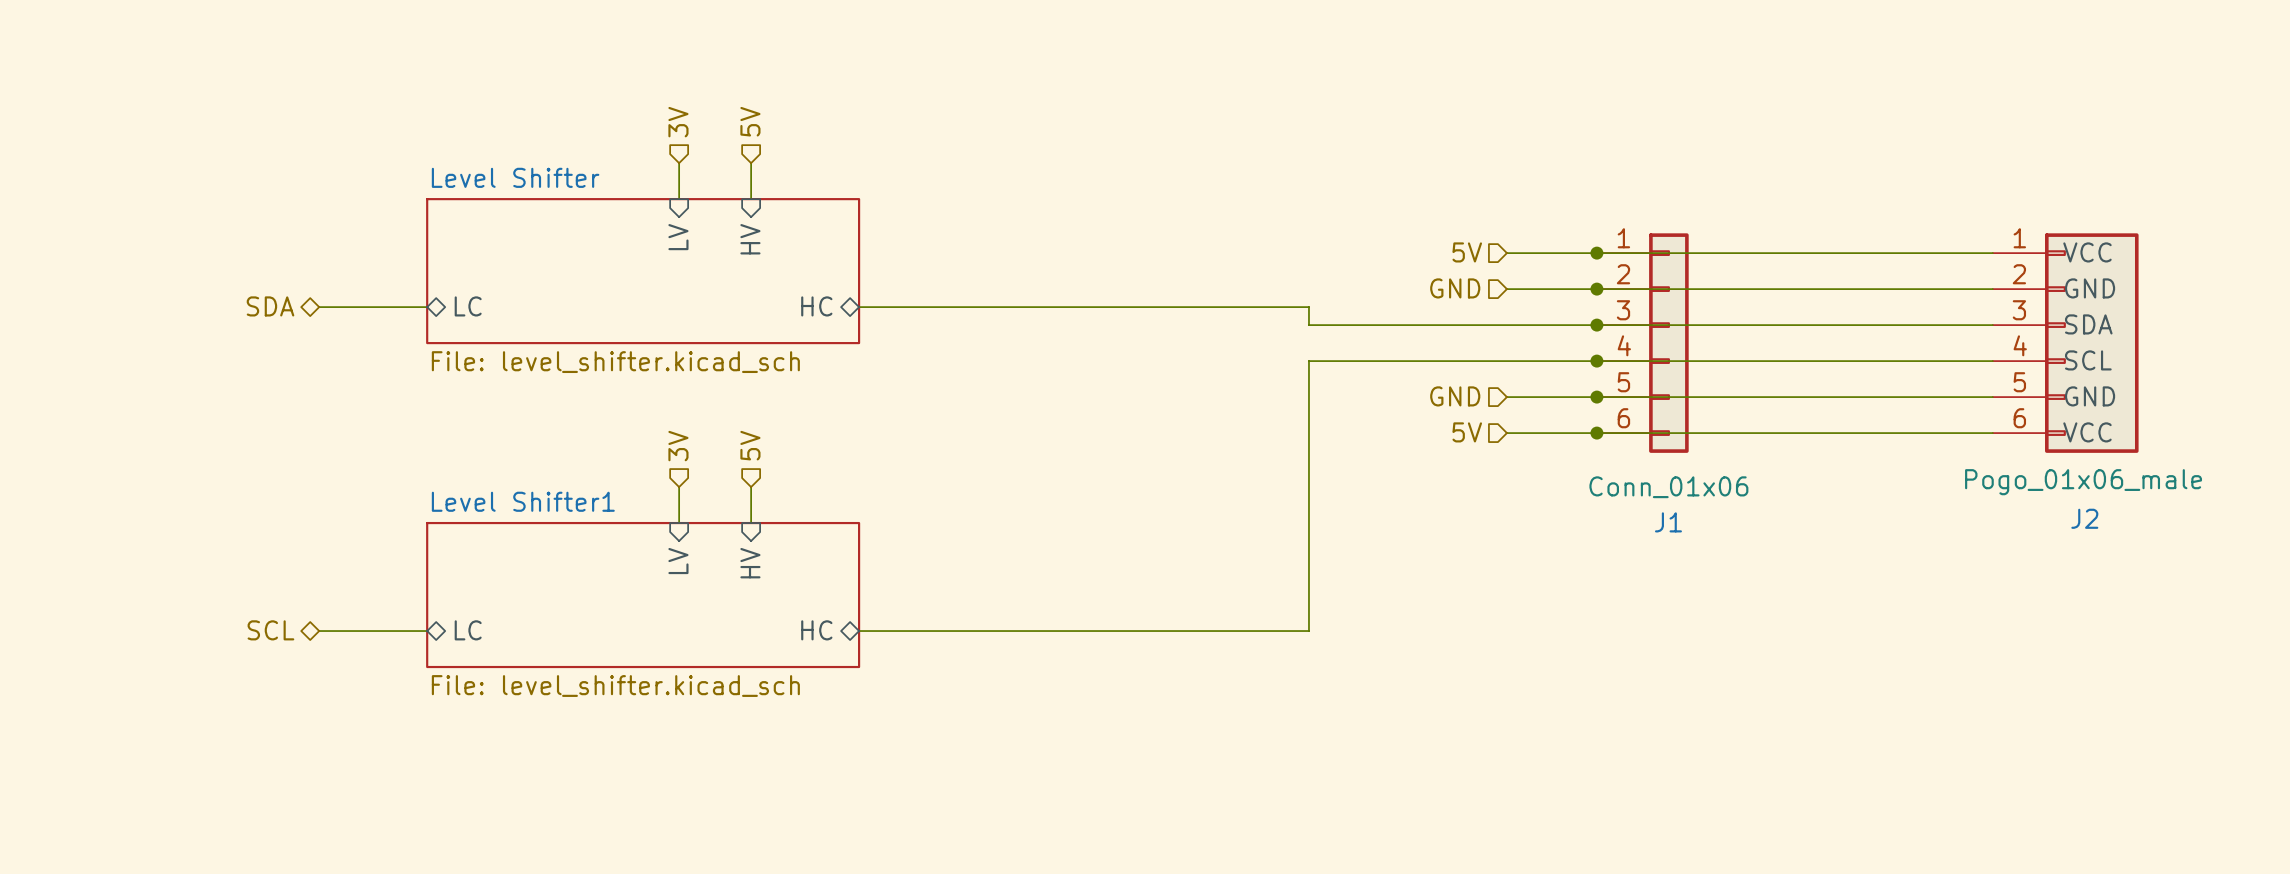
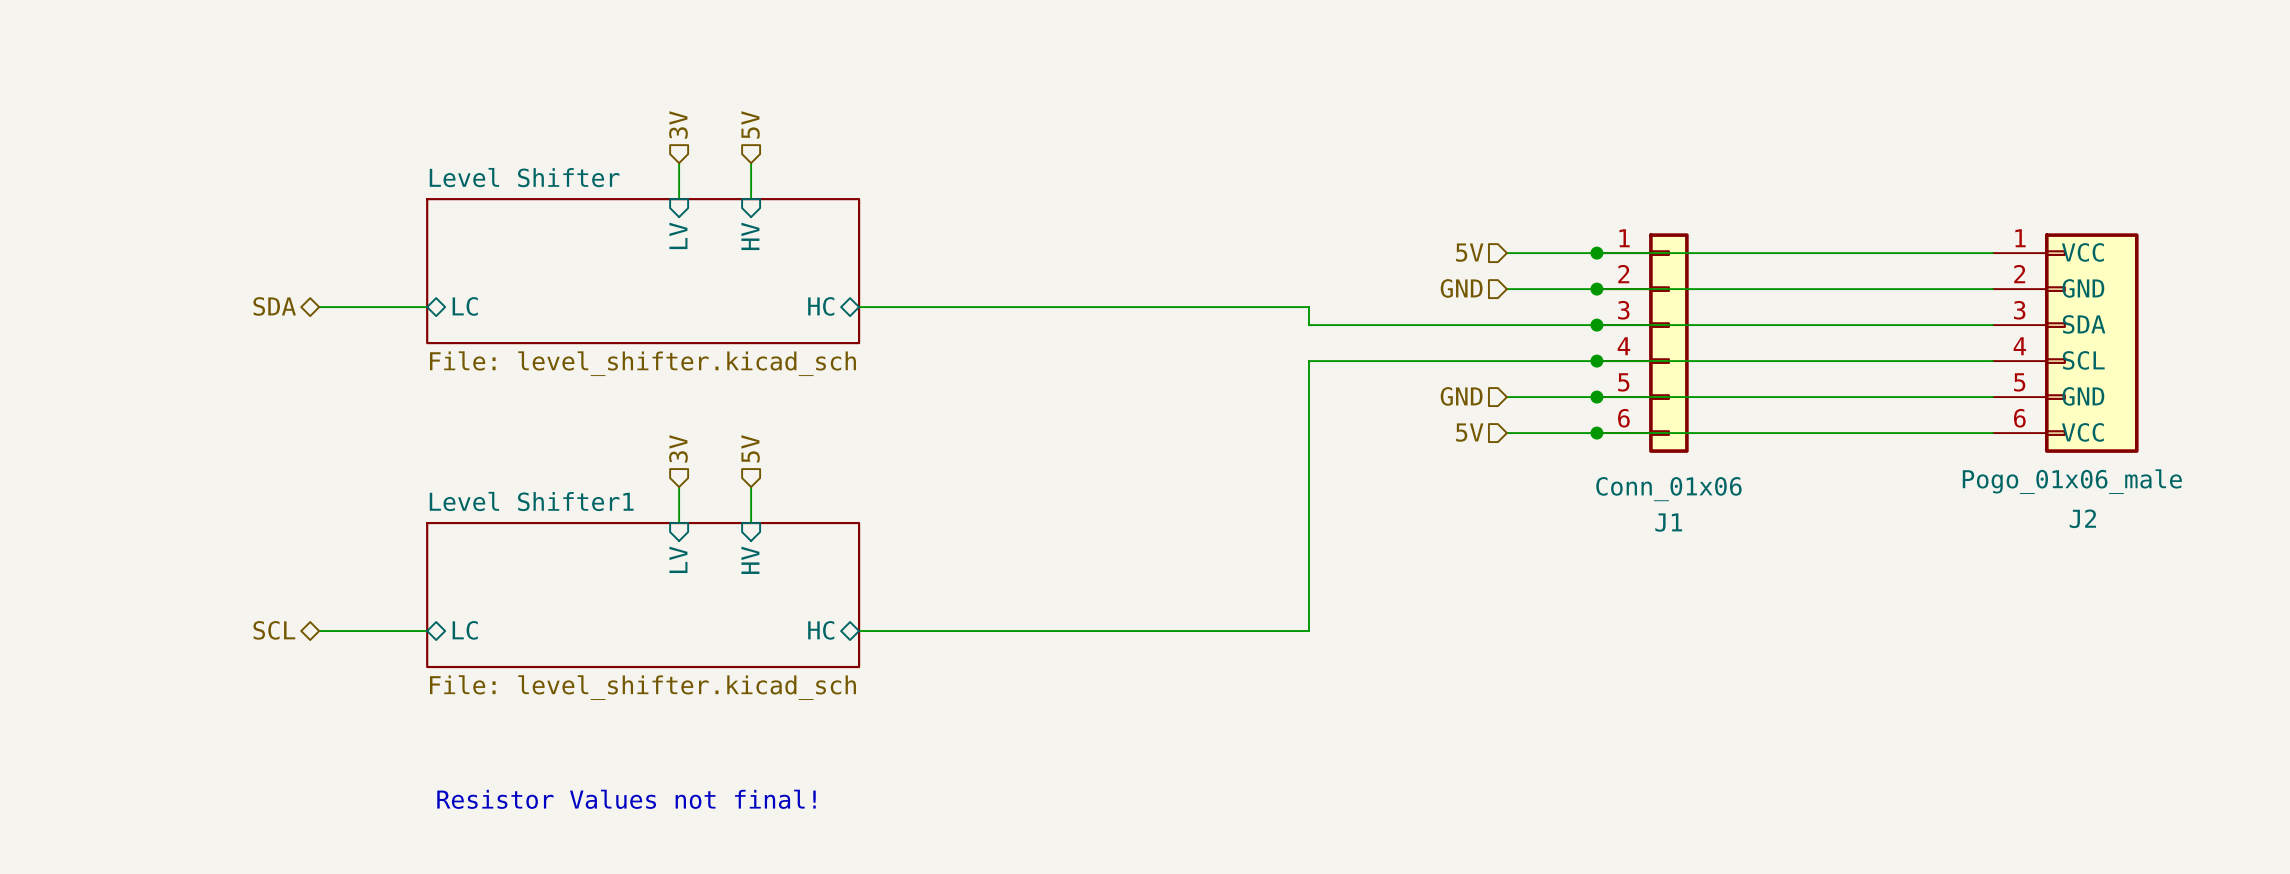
text: none -> Resistor Values not final! (626, 799)

